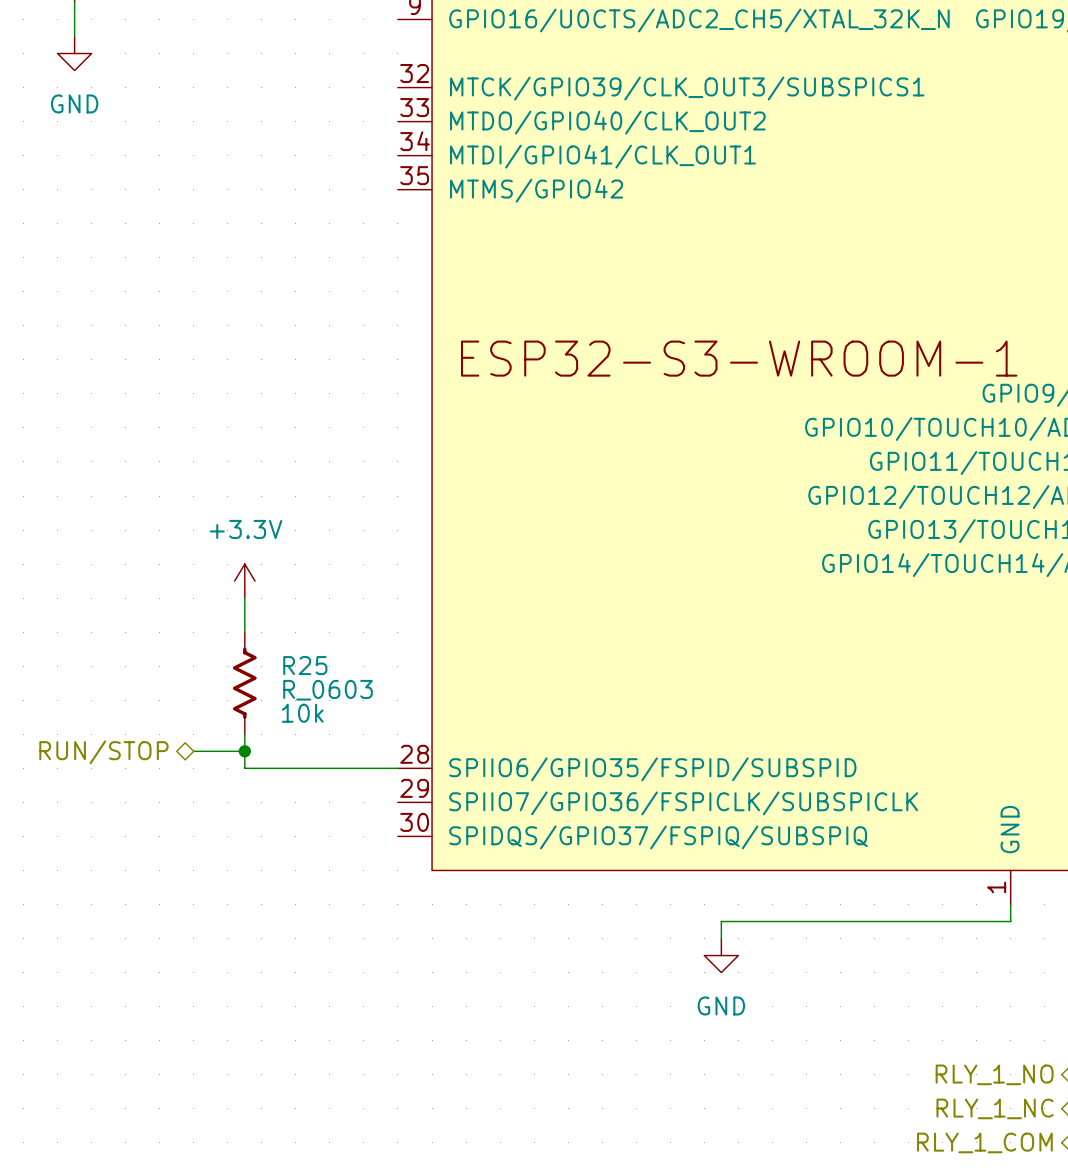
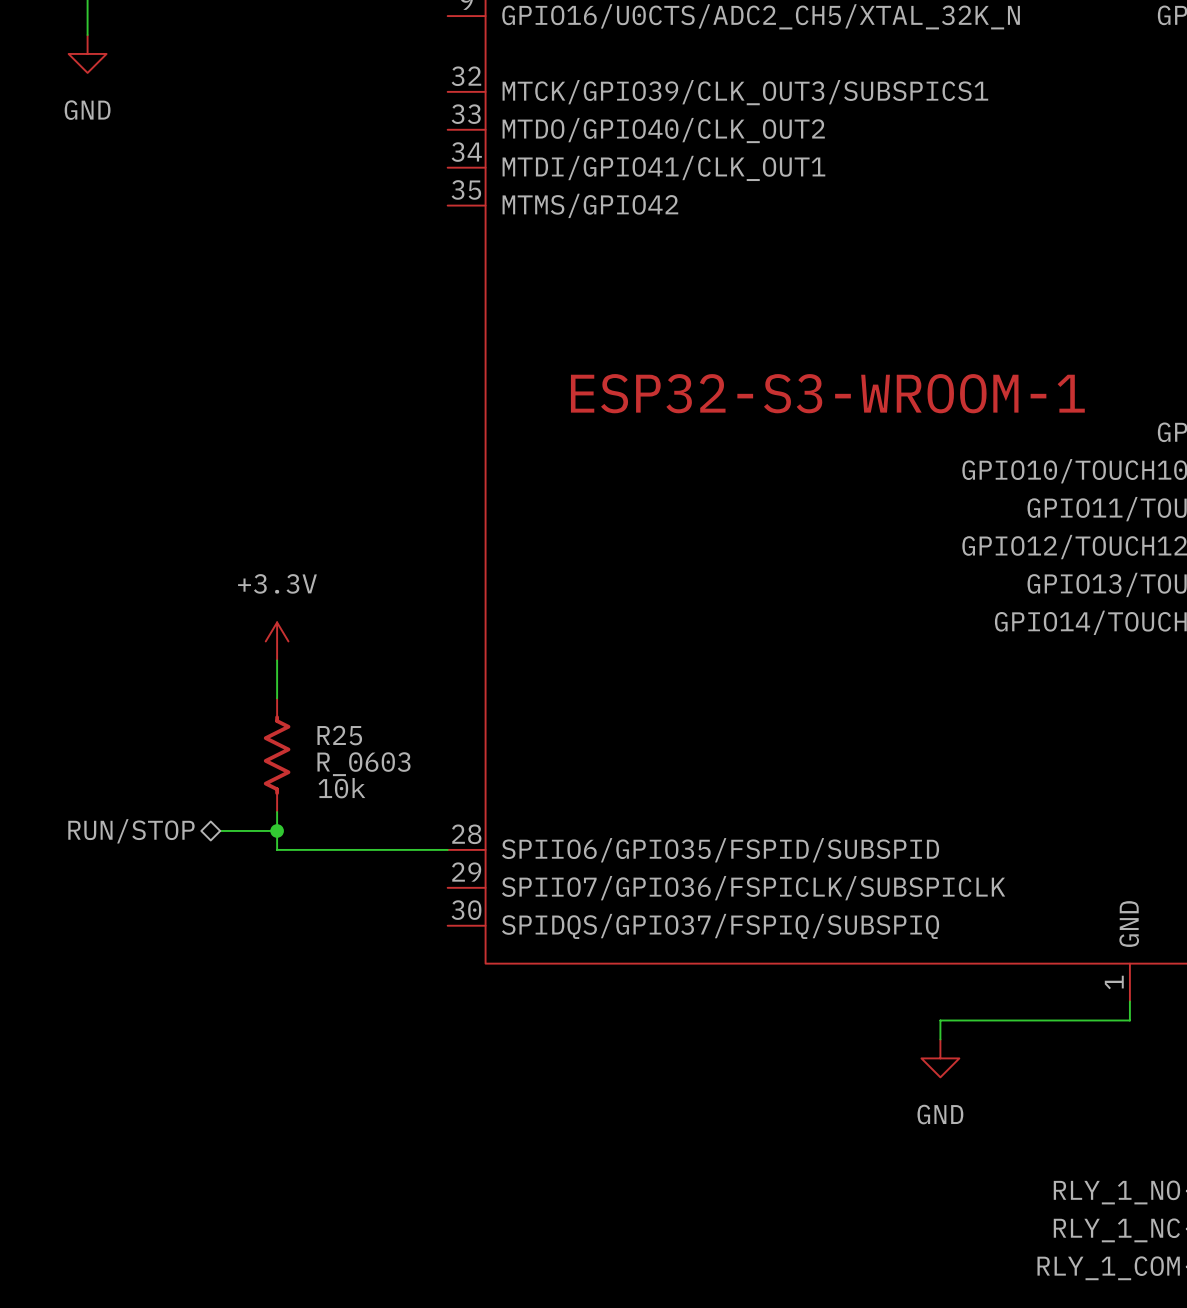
wire: (840, 921) (721, 921) (721, 938) -> (940, 1020) (940, 1039)
power symbol position: GND (721, 955) -> GND (940, 1058)

